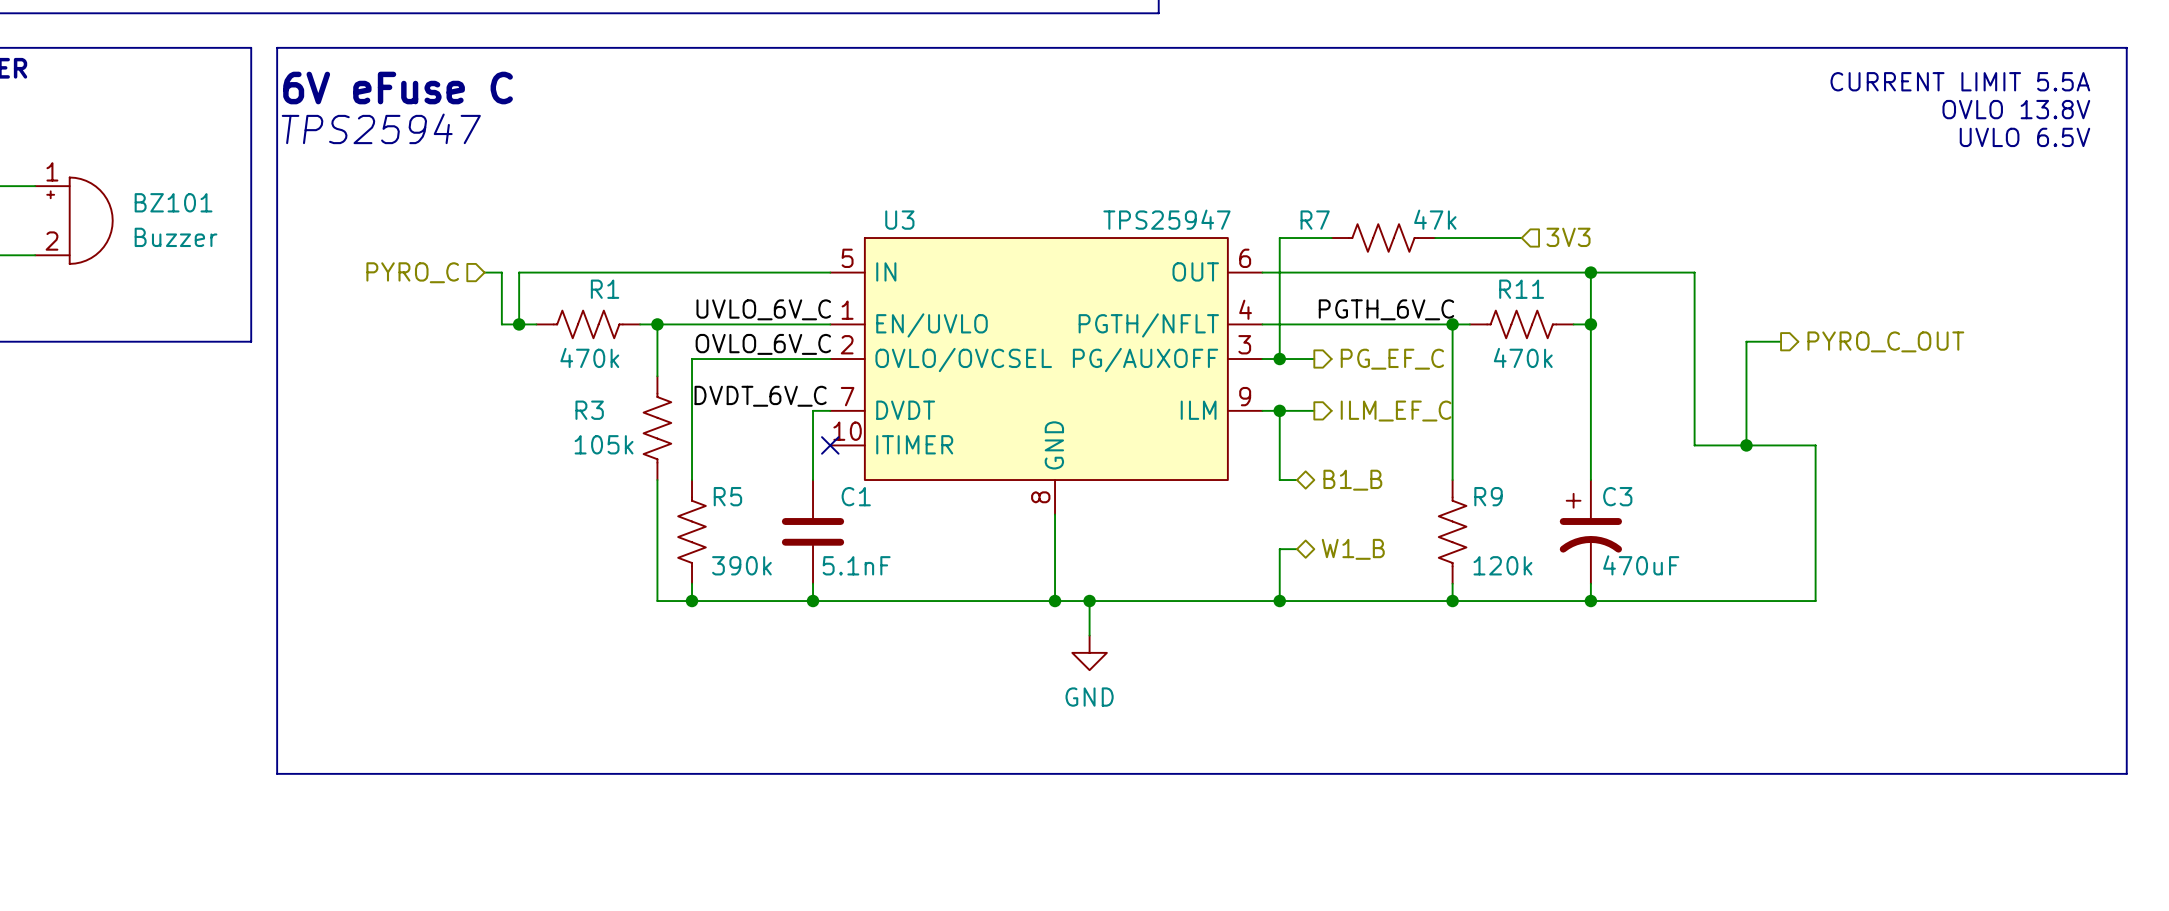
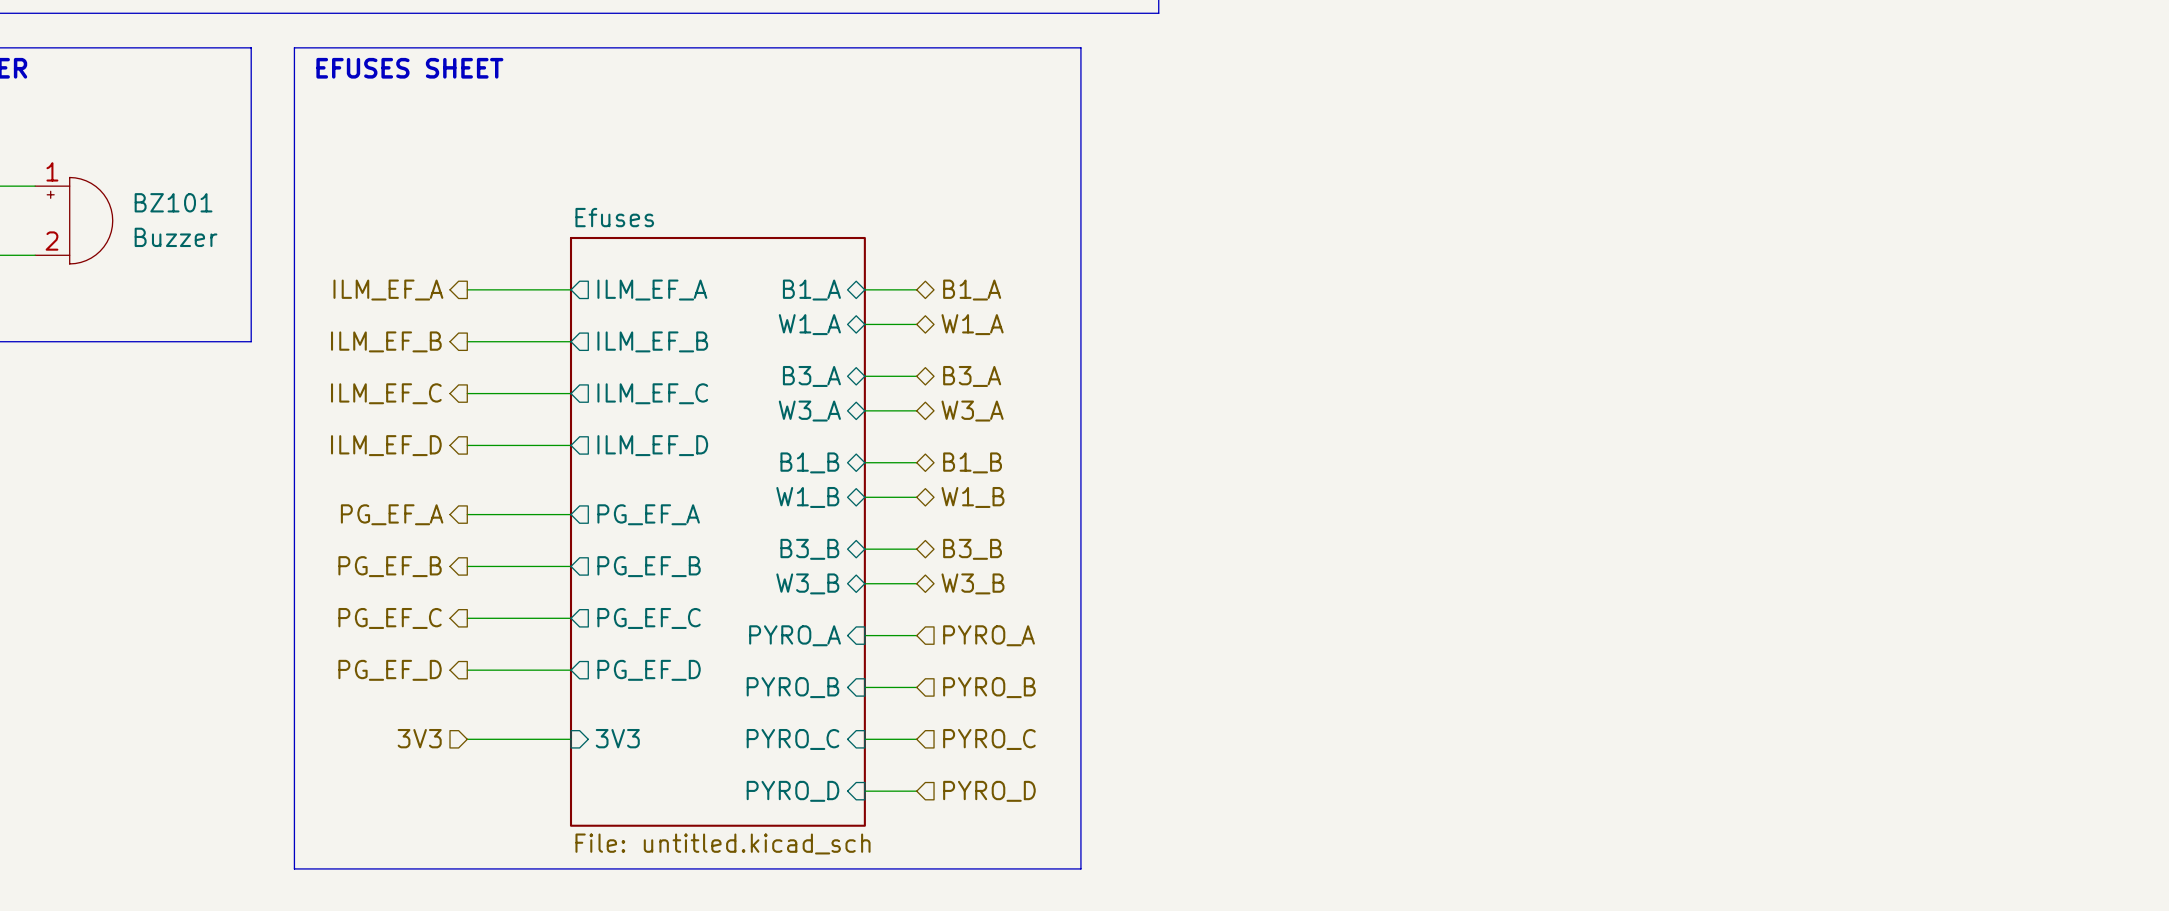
line: (294, 47) (277, 47) (277, 773) (2126, 773) (2126, 47) (1080, 47) -> (294, 47) (294, 868) (1080, 868) (1080, 47)
text: none -> EFUSES SHEET (409, 68)
text: CURRENT LIMIT 5.5A (1960, 81) -> none
text: 6V eFuse C (398, 88) -> none
text: OVLO 13.8V (2016, 109) -> none
text: TPS25947 (381, 128) -> none
text: UVLO 6.5V (2024, 137) -> none
hierarchical label: 3V3 (1568, 237) -> none
wire: (1331, 238) (1279, 238) (1279, 359) -> none
R7: 47k (1383, 238) -> none
wire: (1435, 238) (1521, 238) -> none
hierarchical label: PYRO_C (412, 272) -> none
wire: (484, 272) (501, 272) (501, 324) (536, 324) -> none
wire: (830, 272) (519, 272) (519, 324) -> none
wire: (1262, 272) (1694, 272) (1694, 445) (1815, 445) (1815, 601) (657, 601) (657, 480) -> none
wire: (1590, 272) (1590, 480) -> none
junction: (1590, 272) -> none
wire: none -> (467, 289) (571, 289)
hierarchical label: none -> ILM_EF_A (388, 290)
sheet pin: none -> ILM_EF_A (652, 290)
sheet pin: none -> B1_A (811, 290)
hierarchical label: none -> B1_A (972, 290)
label: UVLO_6V_C (763, 309) -> none
label: PGTH_6V_C (1386, 309) -> none
junction: (519, 324) -> none
R1: 470k (588, 324) -> none
wire: (640, 324) (830, 324) -> none
wire: (657, 324) (657, 376) -> none
junction: (657, 324) -> none
sheet pin: none -> W1_A (809, 324)
hierarchical label: none -> W1_A (972, 324)
wire: (1262, 324) (1469, 324) -> none
wire: (1452, 324) (1452, 480) -> none
junction: (1452, 324) -> none
R11: 470k (1521, 324) -> none
wire: (1573, 324) (1590, 324) -> none
junction: (1590, 324) -> none
hierarchical label: none -> ILM_EF_B (386, 341)
wire: none -> (467, 341) (571, 341)
sheet pin: none -> ILM_EF_B (652, 341)
wire: (1781, 341) (1746, 341) (1746, 445) -> none
hierarchical label: PYRO_C_OUT (1885, 341) -> none
label: OVLO_6V_C (763, 344) -> none
wire: (830, 359) (692, 359) (692, 480) -> none
wire: (1262, 359) (1314, 359) -> none
junction: (1279, 359) -> none
hierarchical label: PG_EF_C (1392, 359) -> none
sheet pin: none -> B3_A (811, 376)
hierarchical label: none -> B3_A (972, 376)
U3: TPS25947 (1046, 376) -> none
hierarchical label: none -> ILM_EF_C (386, 393)
wire: none -> (467, 393) (571, 393)
sheet pin: none -> ILM_EF_C (652, 393)
label: DVDT_6V_C (760, 396) -> none
wire: (830, 410) (813, 410) (813, 480) -> none
wire: (1262, 410) (1314, 410) -> none
wire: (1279, 410) (1279, 480) (1297, 480) -> none
junction: (1279, 410) -> none
sheet pin: none -> W3_A (809, 411)
hierarchical label: none -> W3_A (972, 411)
hierarchical label: ILM_EF_C (1396, 411) -> none
R3: 105k (657, 428) -> none
hierarchical label: none -> ILM_EF_D (386, 445)
wire: none -> (467, 445) (571, 445)
sheet pin: none -> ILM_EF_D (652, 445)
no-connect mark: (830, 445) -> none
junction: (1746, 445) -> none
sheet pin: none -> B1_B (809, 462)
hierarchical label: none -> B1_B (972, 462)
hierarchical label: B1_B (1352, 480) -> none
sheet pin: none -> W1_B (807, 497)
wire: none -> (864, 497) (916, 497)
hierarchical label: none -> W1_B (972, 497)
hierarchical label: none -> PG_EF_A (392, 514)
wire: none -> (467, 514) (571, 514)
sheet pin: none -> PG_EF_A (648, 514)
wire: (1055, 514) (1055, 601) -> none
R5: 390k (692, 531) -> none
sheet Efuses: none -> File: untitled.kicad_sch (717, 531)
C1: 5.1nF (813, 531) -> none
R9: 120k (1452, 531) -> none
C3: 470uF (1590, 531) -> none
sheet pin: none -> B3_B (809, 549)
wire: none -> (864, 549) (916, 549)
hierarchical label: none -> B3_B (972, 549)
wire: (1297, 549) (1279, 549) (1279, 601) -> none
hierarchical label: W1_B (1353, 549) -> none
hierarchical label: none -> PG_EF_B (390, 566)
wire: none -> (467, 566) (571, 566)
sheet pin: none -> PG_EF_B (649, 566)
wire: (692, 583) (692, 601) -> none
sheet pin: none -> W3_B (807, 583)
wire: (813, 583) (813, 601) -> none
wire: none -> (864, 583) (916, 583)
hierarchical label: none -> W3_B (972, 583)
wire: (1452, 583) (1452, 601) -> none
wire: (1590, 583) (1590, 601) -> none
junction: (692, 601) -> none
junction: (813, 601) -> none
junction: (1055, 601) -> none
wire: (1089, 601) (1089, 635) -> none
junction: (1089, 601) -> none
junction: (1279, 601) -> none
junction: (1452, 601) -> none
junction: (1590, 601) -> none
hierarchical label: none -> PG_EF_C (390, 618)
wire: none -> (467, 618) (571, 618)
sheet pin: none -> PG_EF_C (649, 618)
sheet pin: none -> PYRO_A (795, 635)
wire: none -> (864, 635) (916, 635)
hierarchical label: none -> PYRO_A (989, 635)
power symbol: GND (1089, 652) -> none
hierarchical label: none -> PG_EF_D (390, 670)
wire: none -> (467, 670) (571, 670)
sheet pin: none -> PG_EF_D (649, 670)
sheet pin: none -> PYRO_B (792, 687)
wire: none -> (864, 687) (916, 687)
hierarchical label: none -> PYRO_B (989, 687)
hierarchical label: none -> 3V3 (419, 738)
sheet pin: none -> 3V3 (617, 738)
wire: none -> (467, 739) (571, 739)
sheet pin: none -> PYRO_C (792, 739)
wire: none -> (864, 739) (916, 739)
hierarchical label: none -> PYRO_C (989, 739)
sheet pin: none -> PYRO_D (792, 791)
wire: none -> (864, 791) (916, 791)
hierarchical label: none -> PYRO_D (989, 791)

